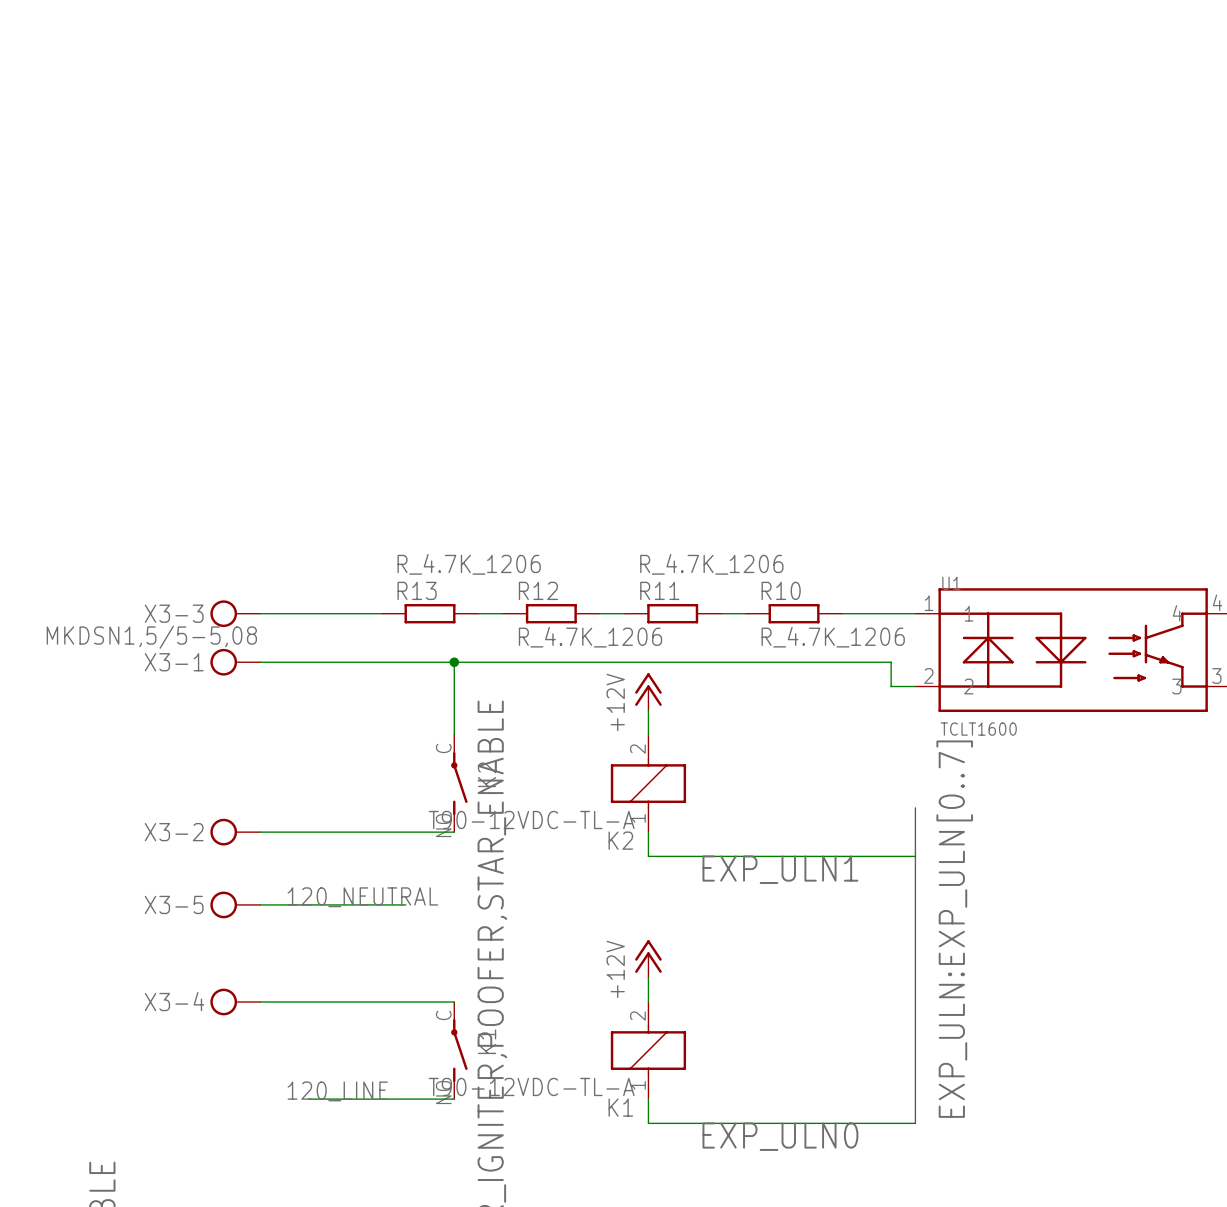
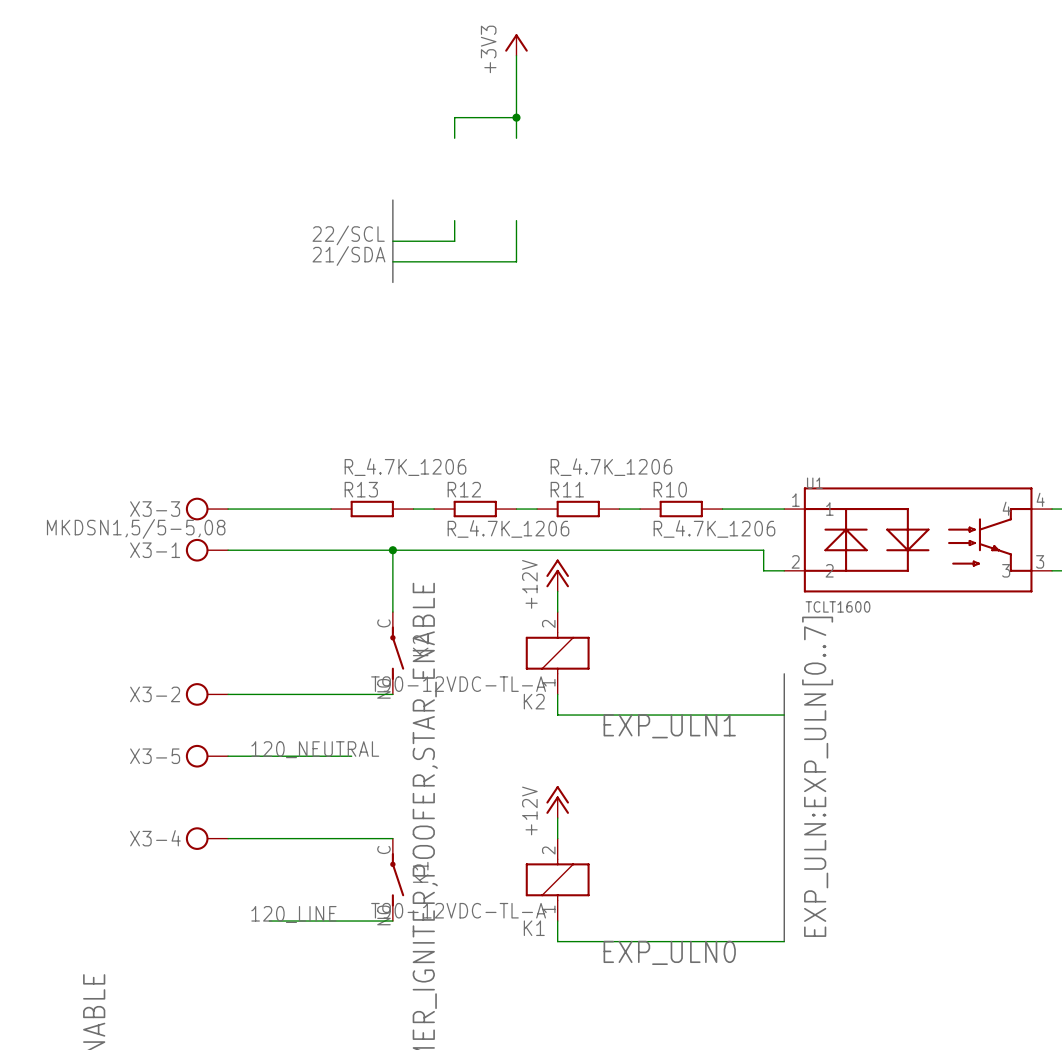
power symbol: none -> +3V3 (516, 45)
wire: none -> (516, 55) (516, 138)
wire: none -> (516, 117) (454, 117) (454, 138)
junction: none -> (516, 117)
bus: none -> (392, 200) (392, 282)
wire: none -> (454, 220) (454, 241) (392, 241)
wire: none -> (516, 220) (516, 261) (392, 261)
label: none -> 22/SCL (348, 235)
label: none -> 21/SDA (348, 256)

